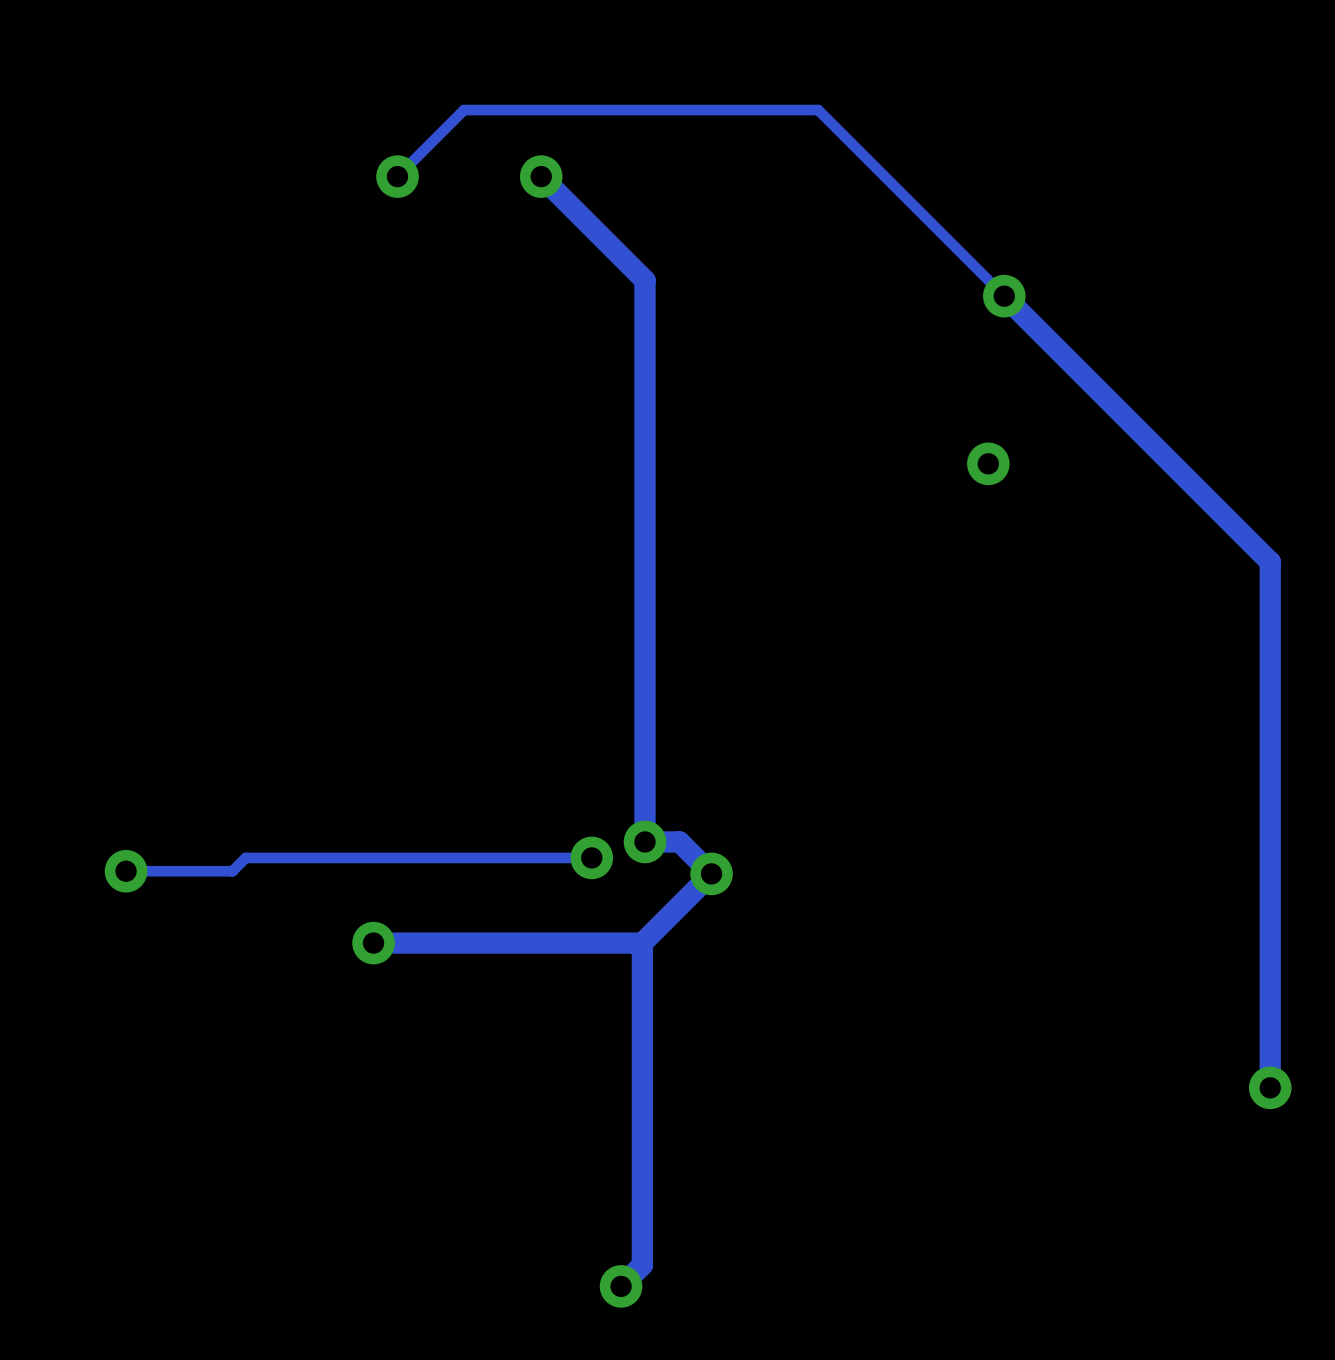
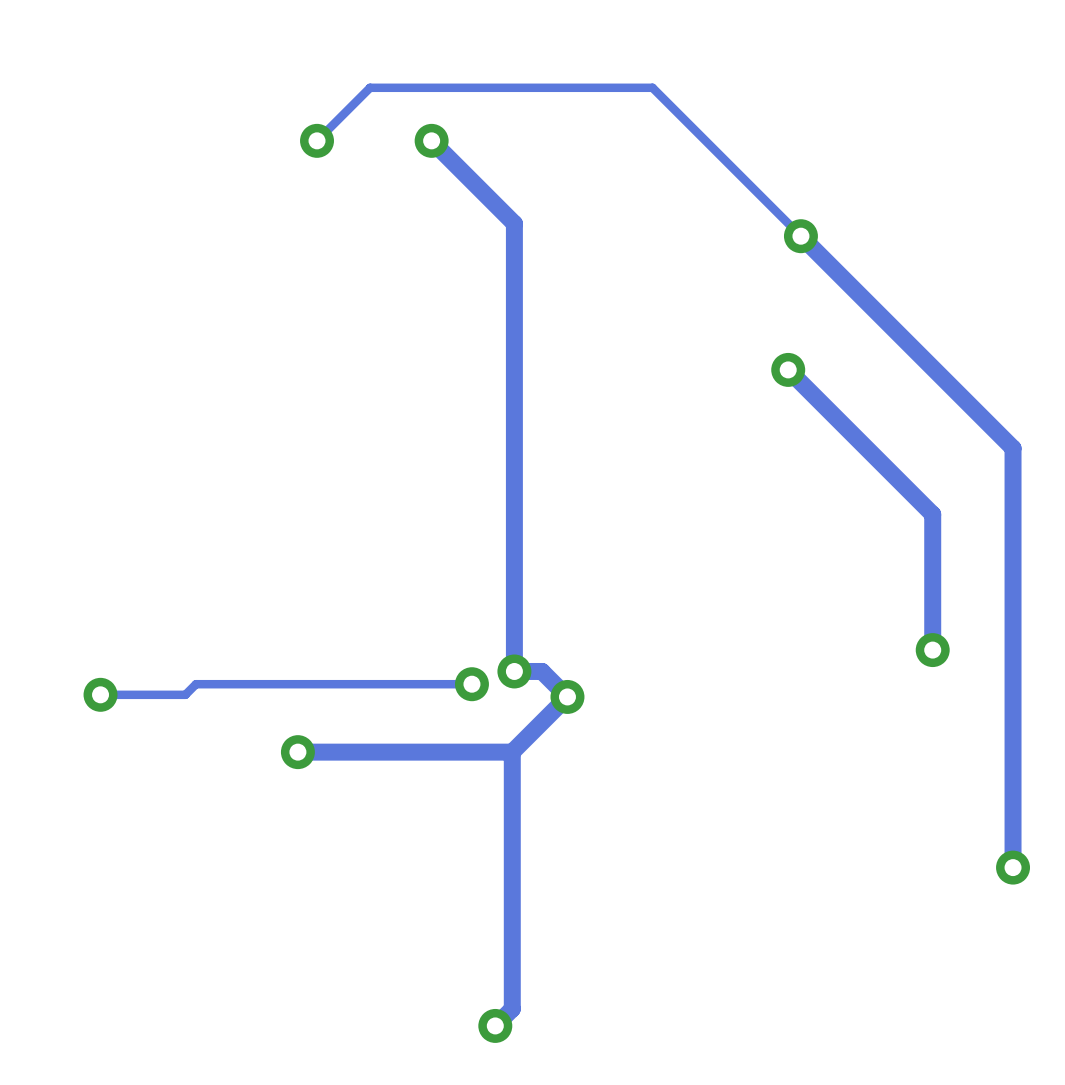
track: none -> (788, 369) (932, 514) (932, 650)
via: none -> (932, 650)

